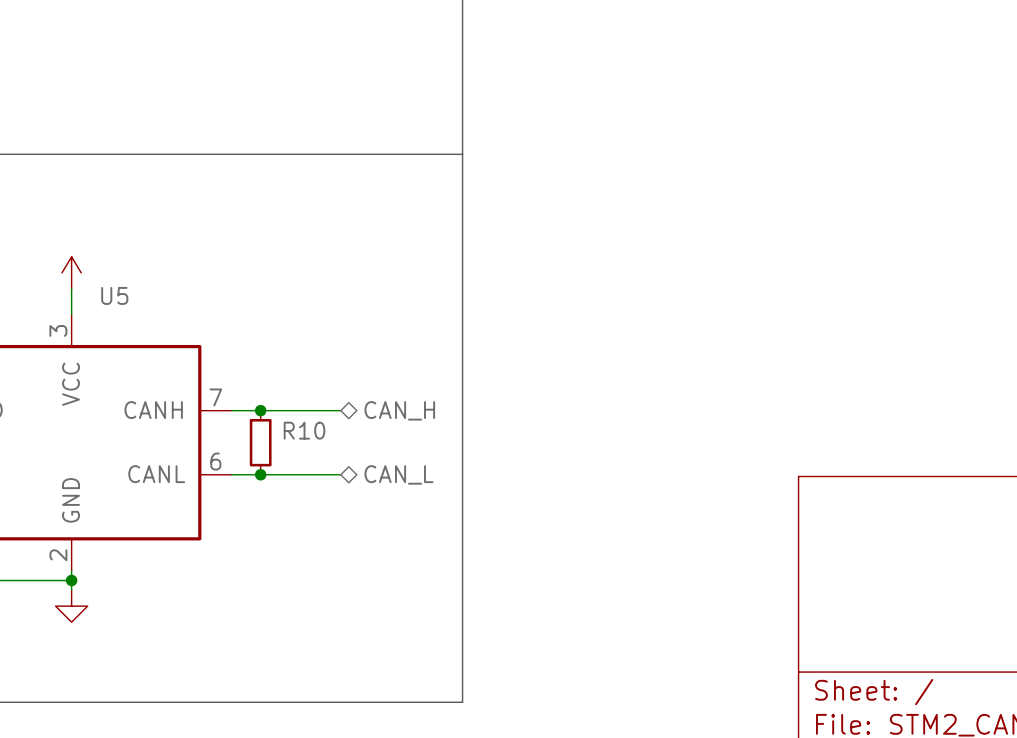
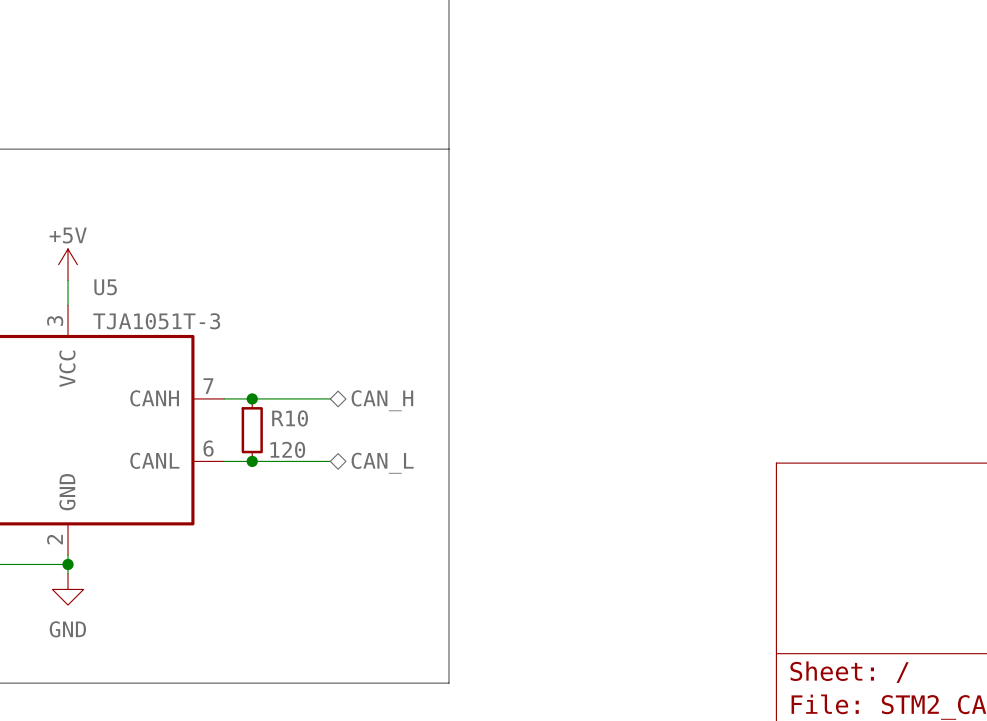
power symbol text: none -> +5V (68, 235)
U5 value: none -> TJA1051T-3 (156, 321)
R10 value: none -> 120 (287, 449)
power symbol text: none -> GND (67, 629)

